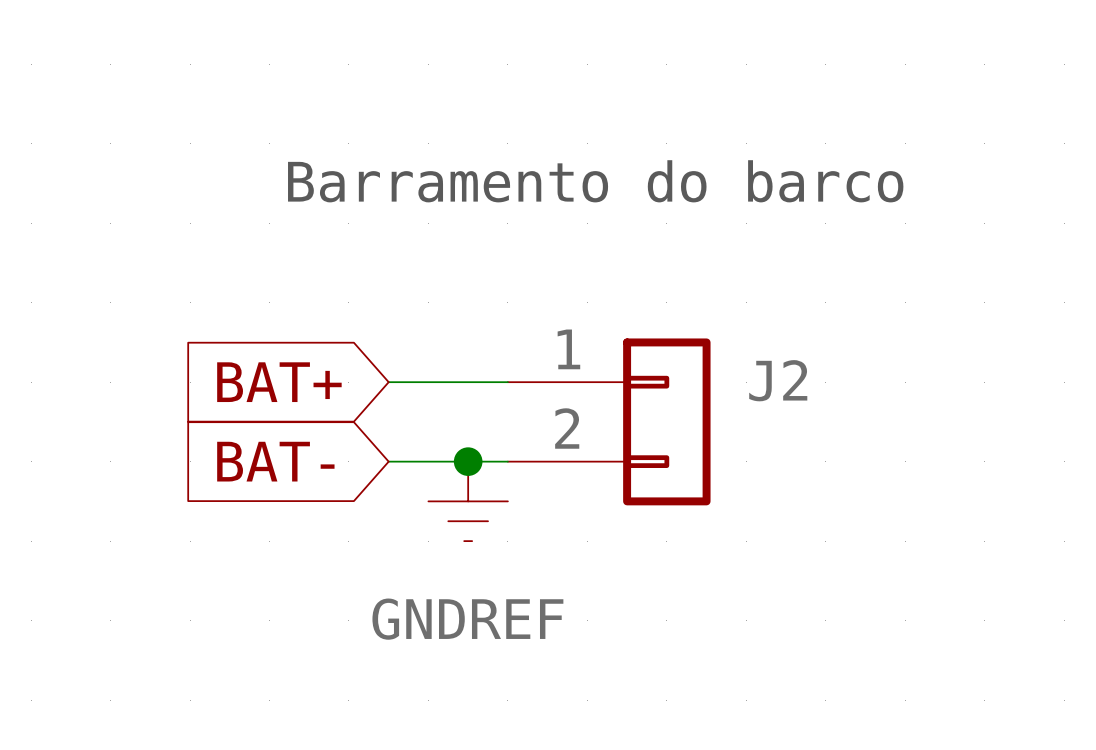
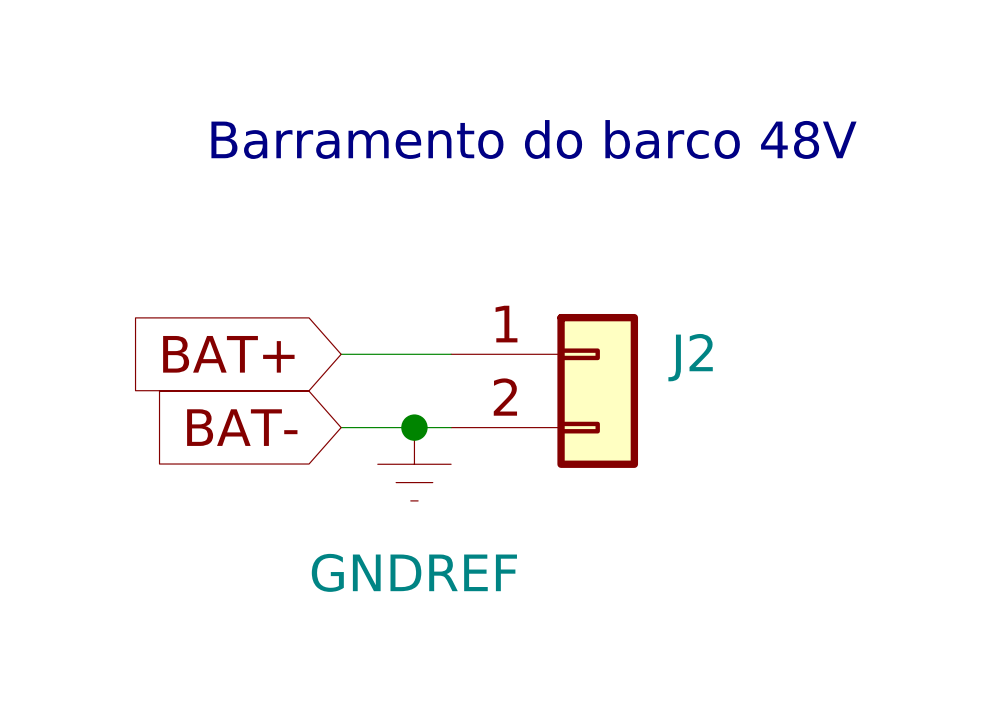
text: Barramento do barco (595, 181) -> Barramento do barco 48V (533, 139)

